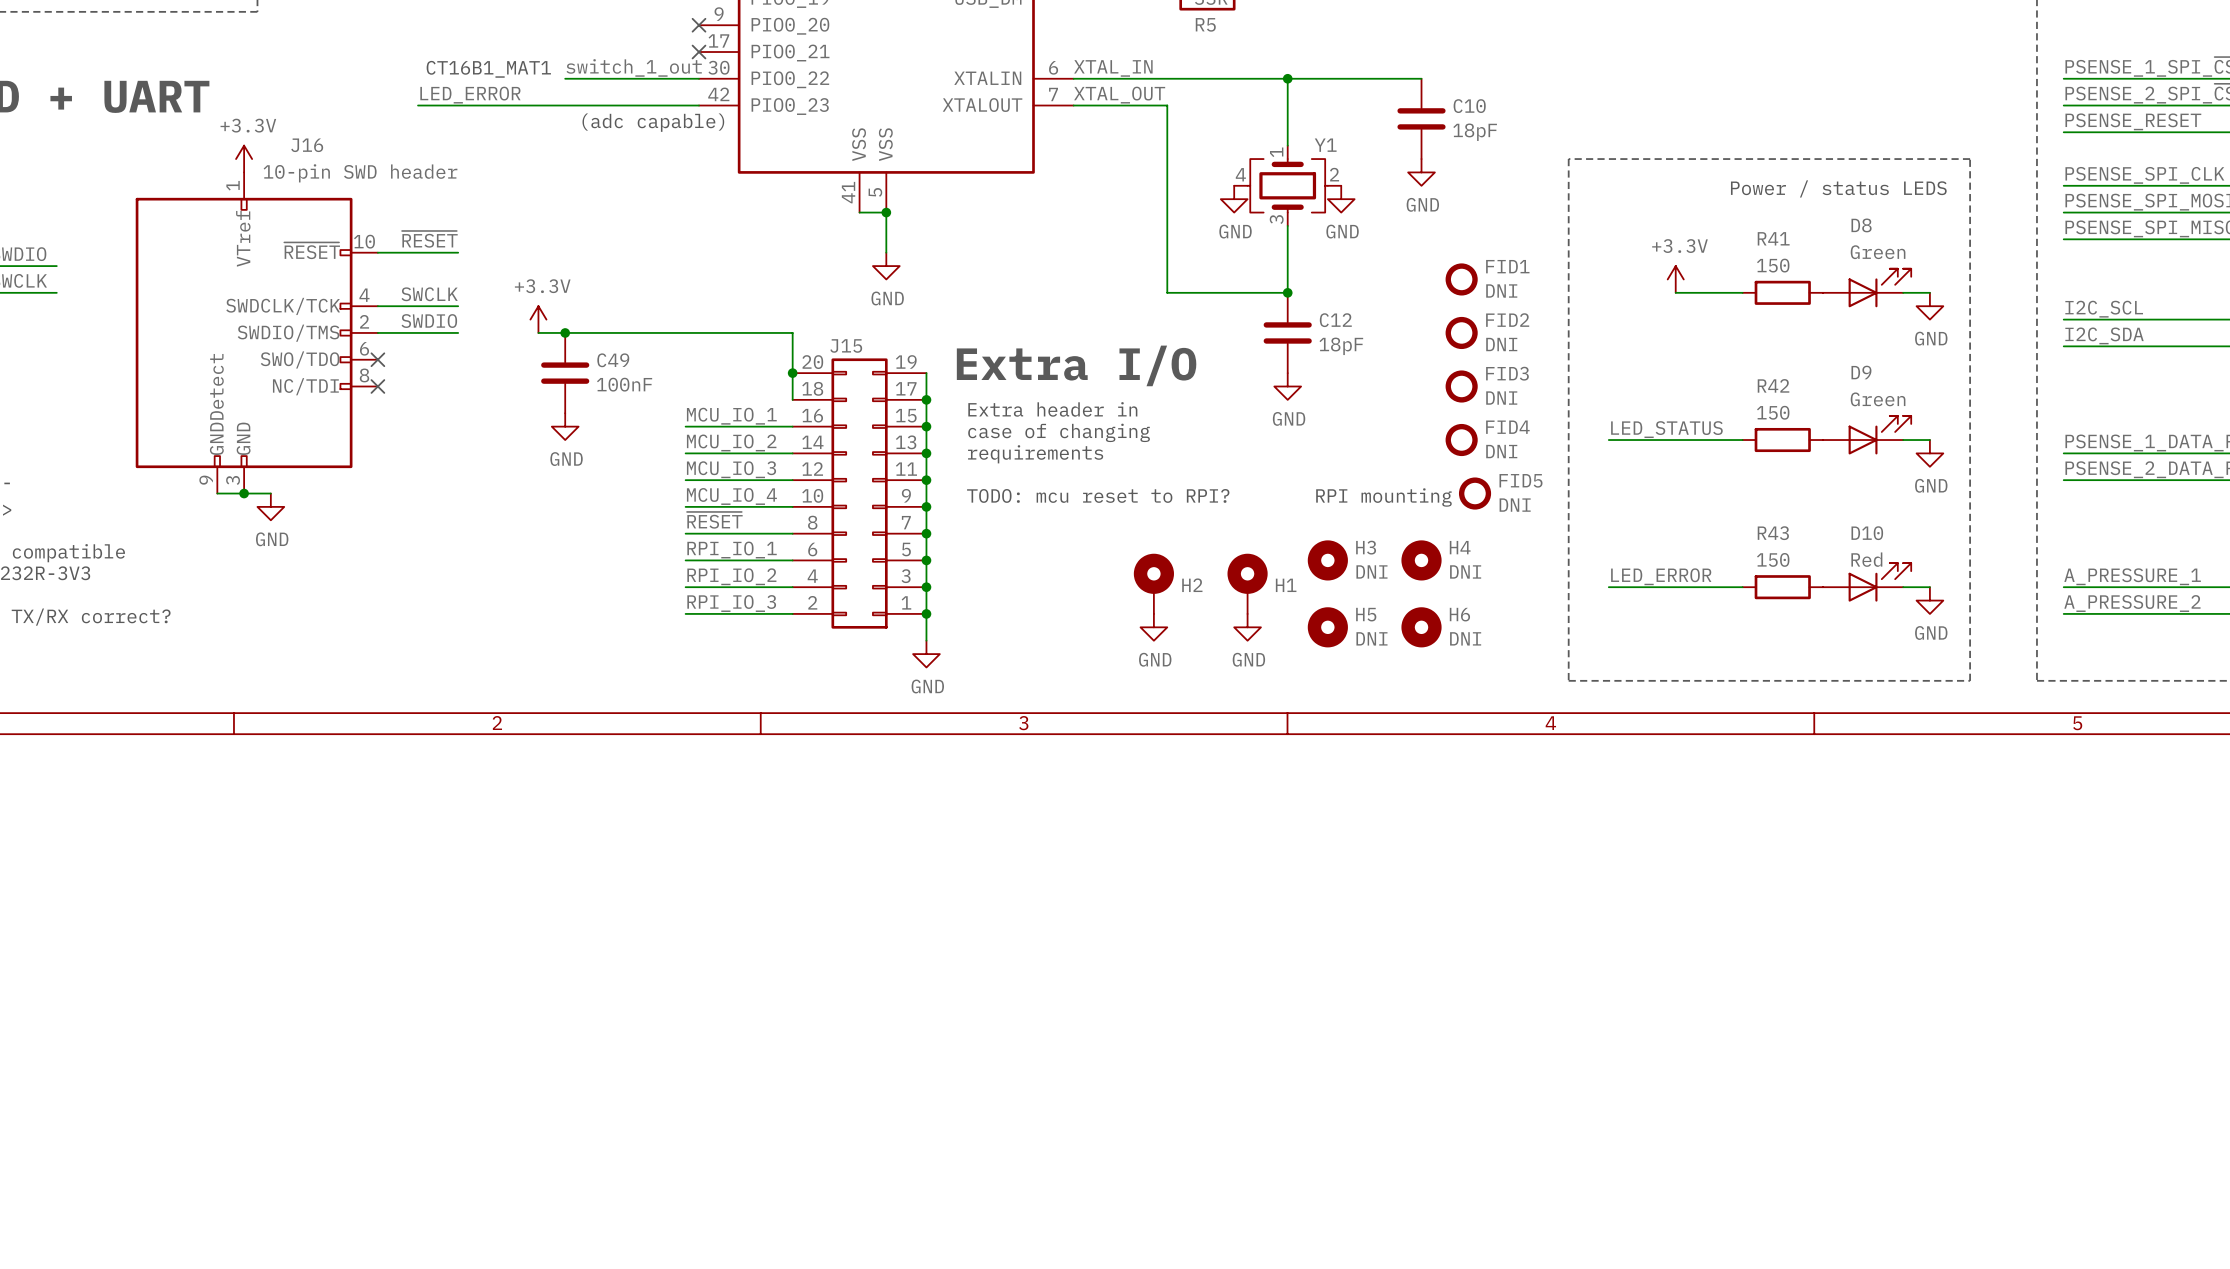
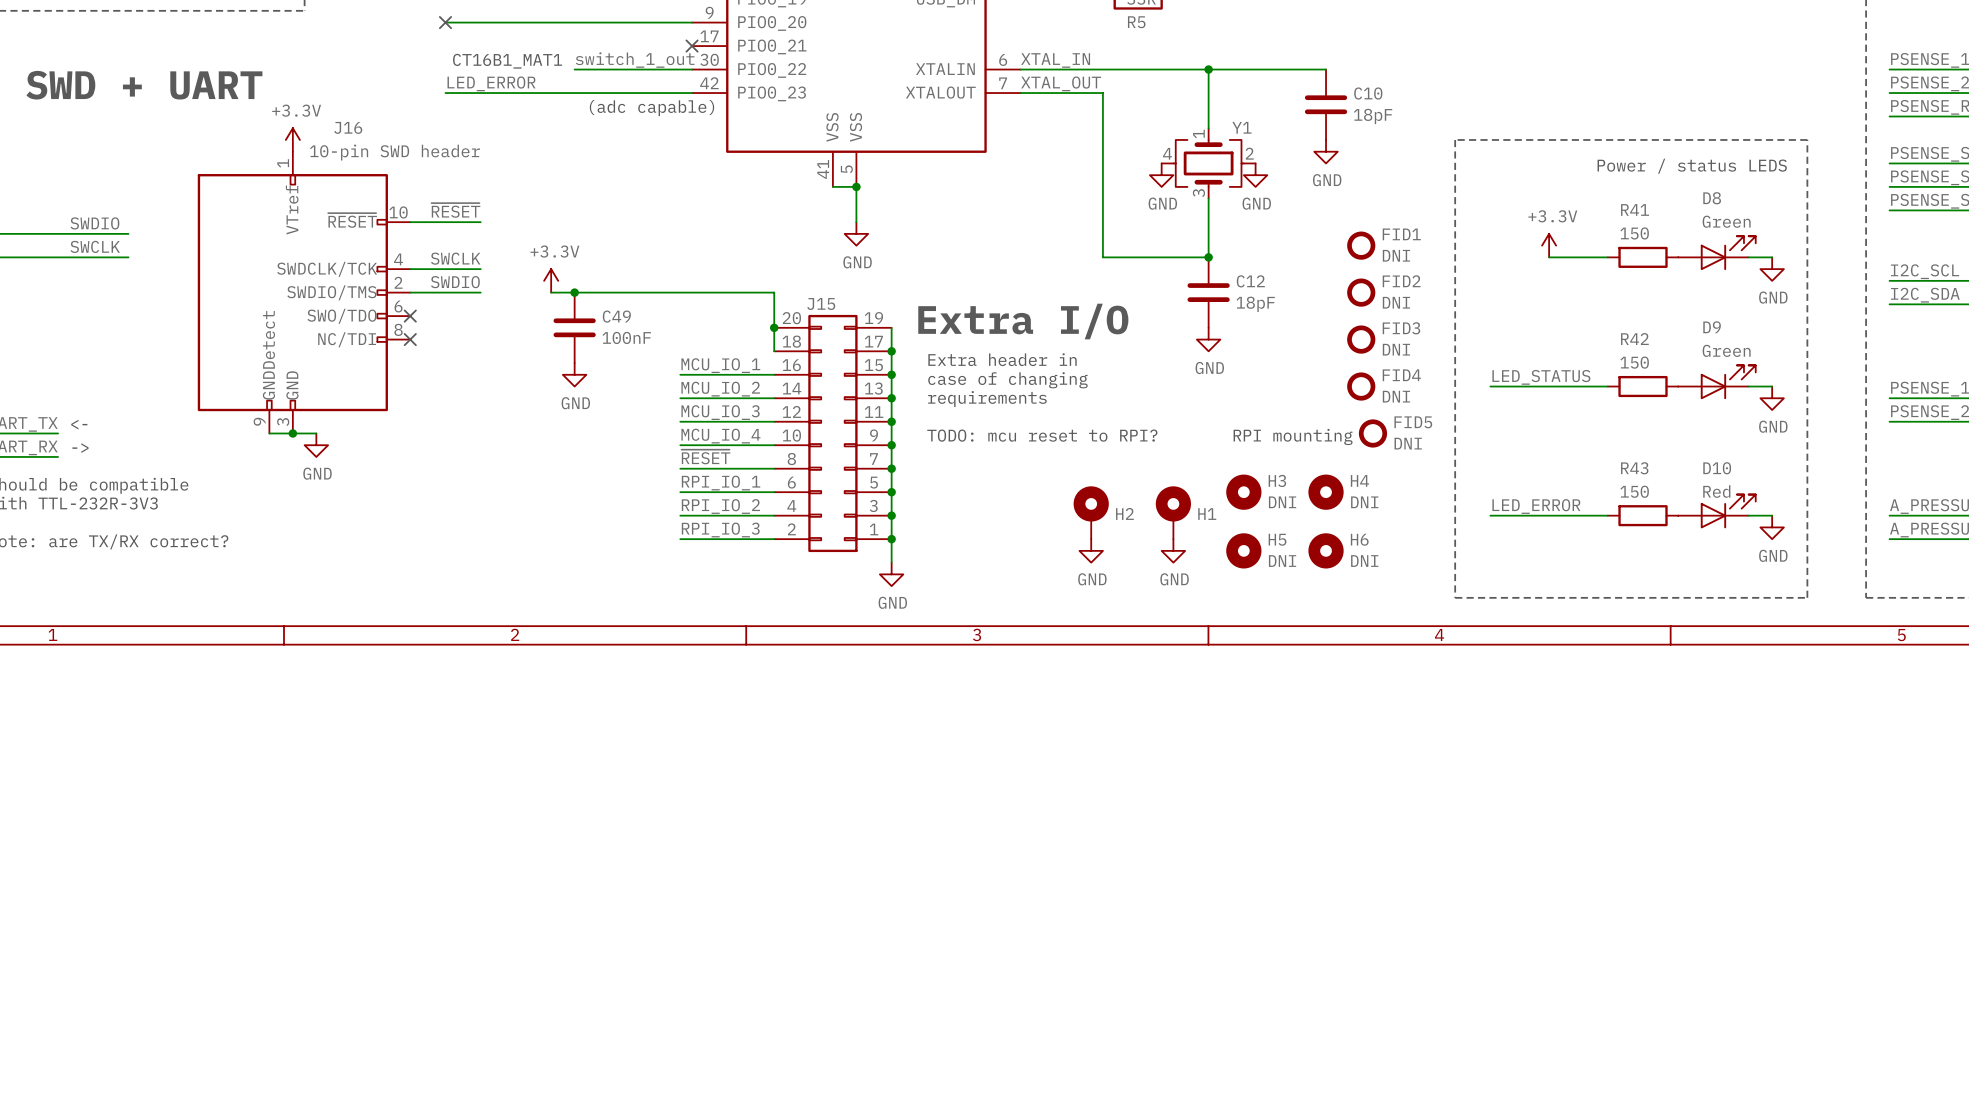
wire: none -> (445, 22) (692, 22)
no-connect mark: none -> (445, 22)
no-connect mark: (699, 25) -> none

